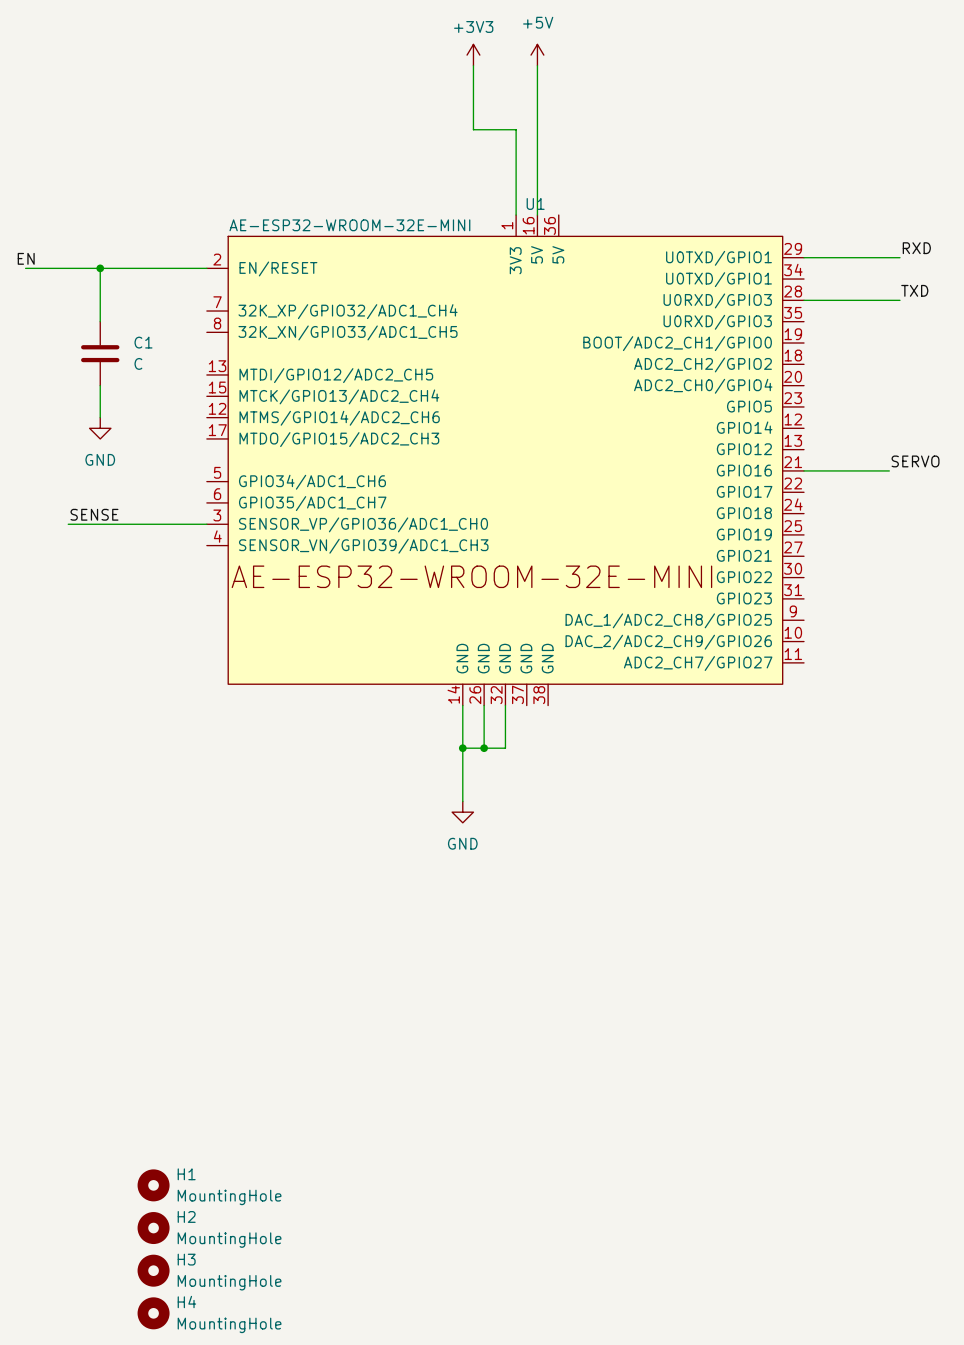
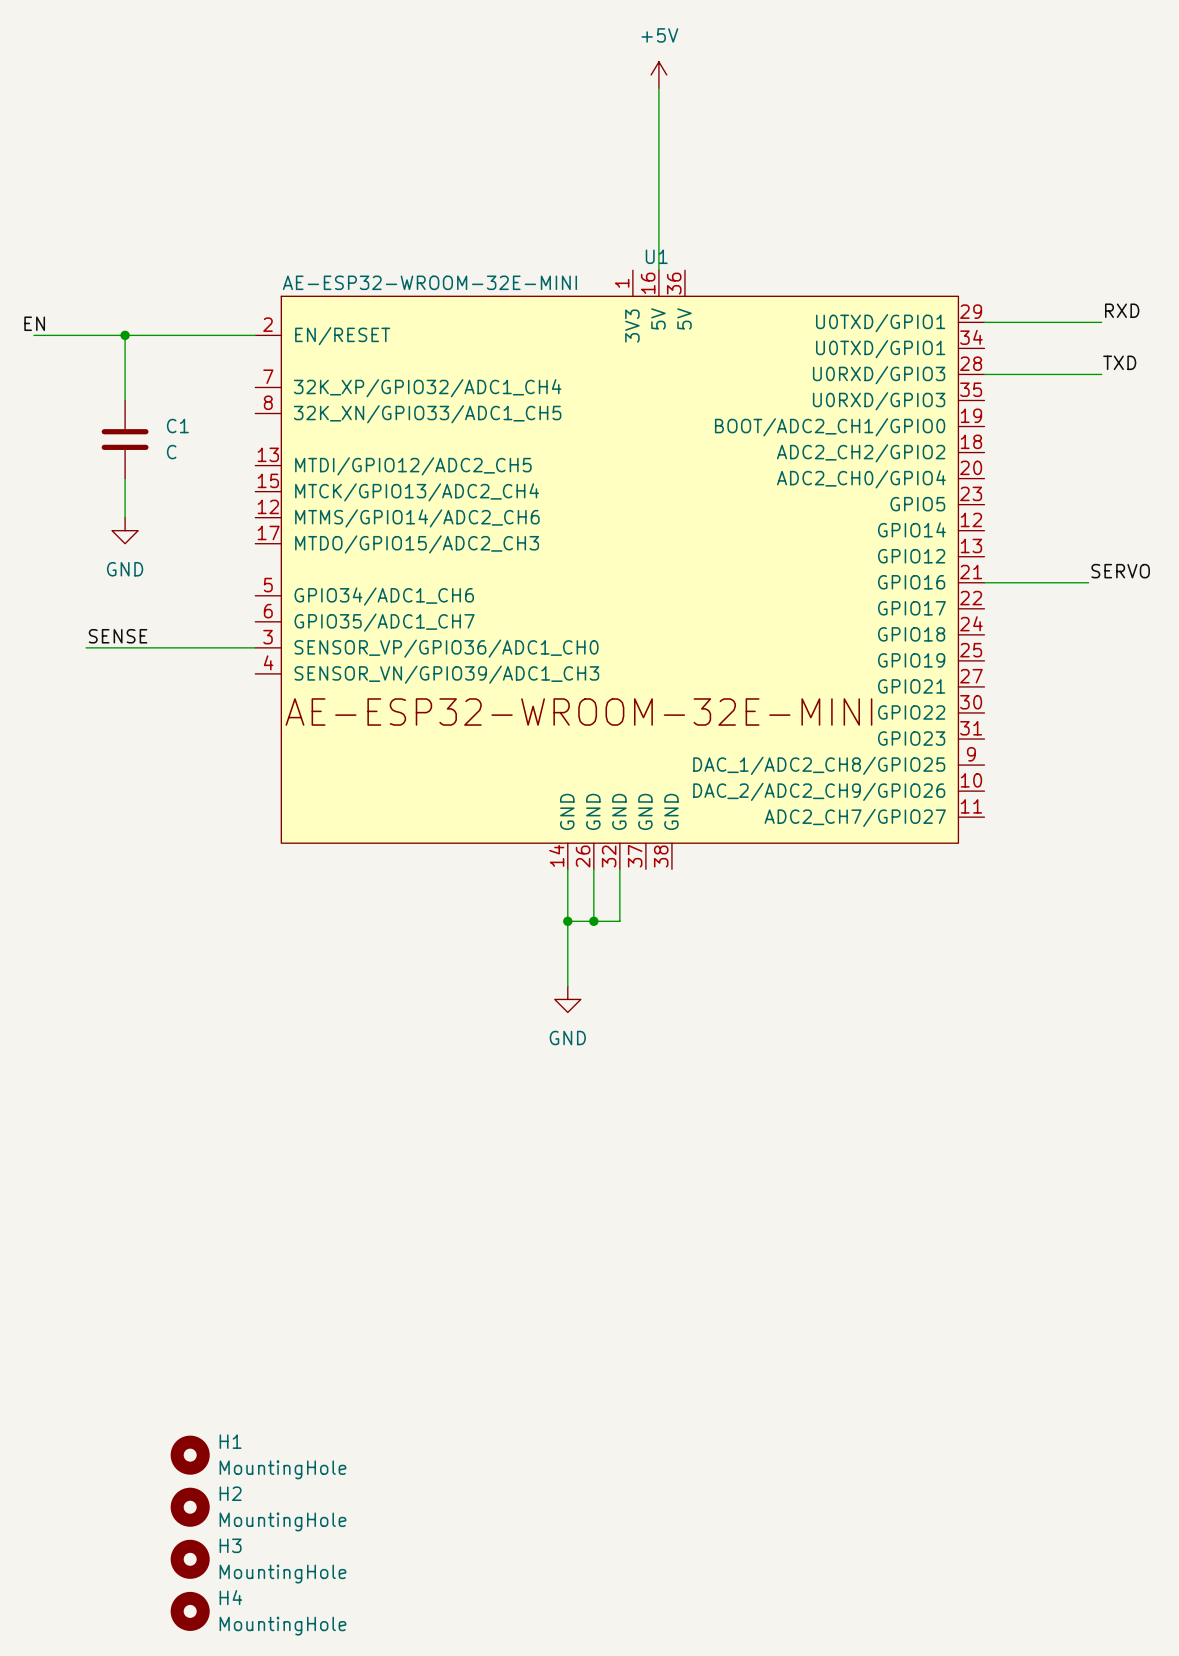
power symbol: +3V3 (473, 55) -> none
wire: (473, 65) (473, 129) (516, 129) (516, 215) -> none

